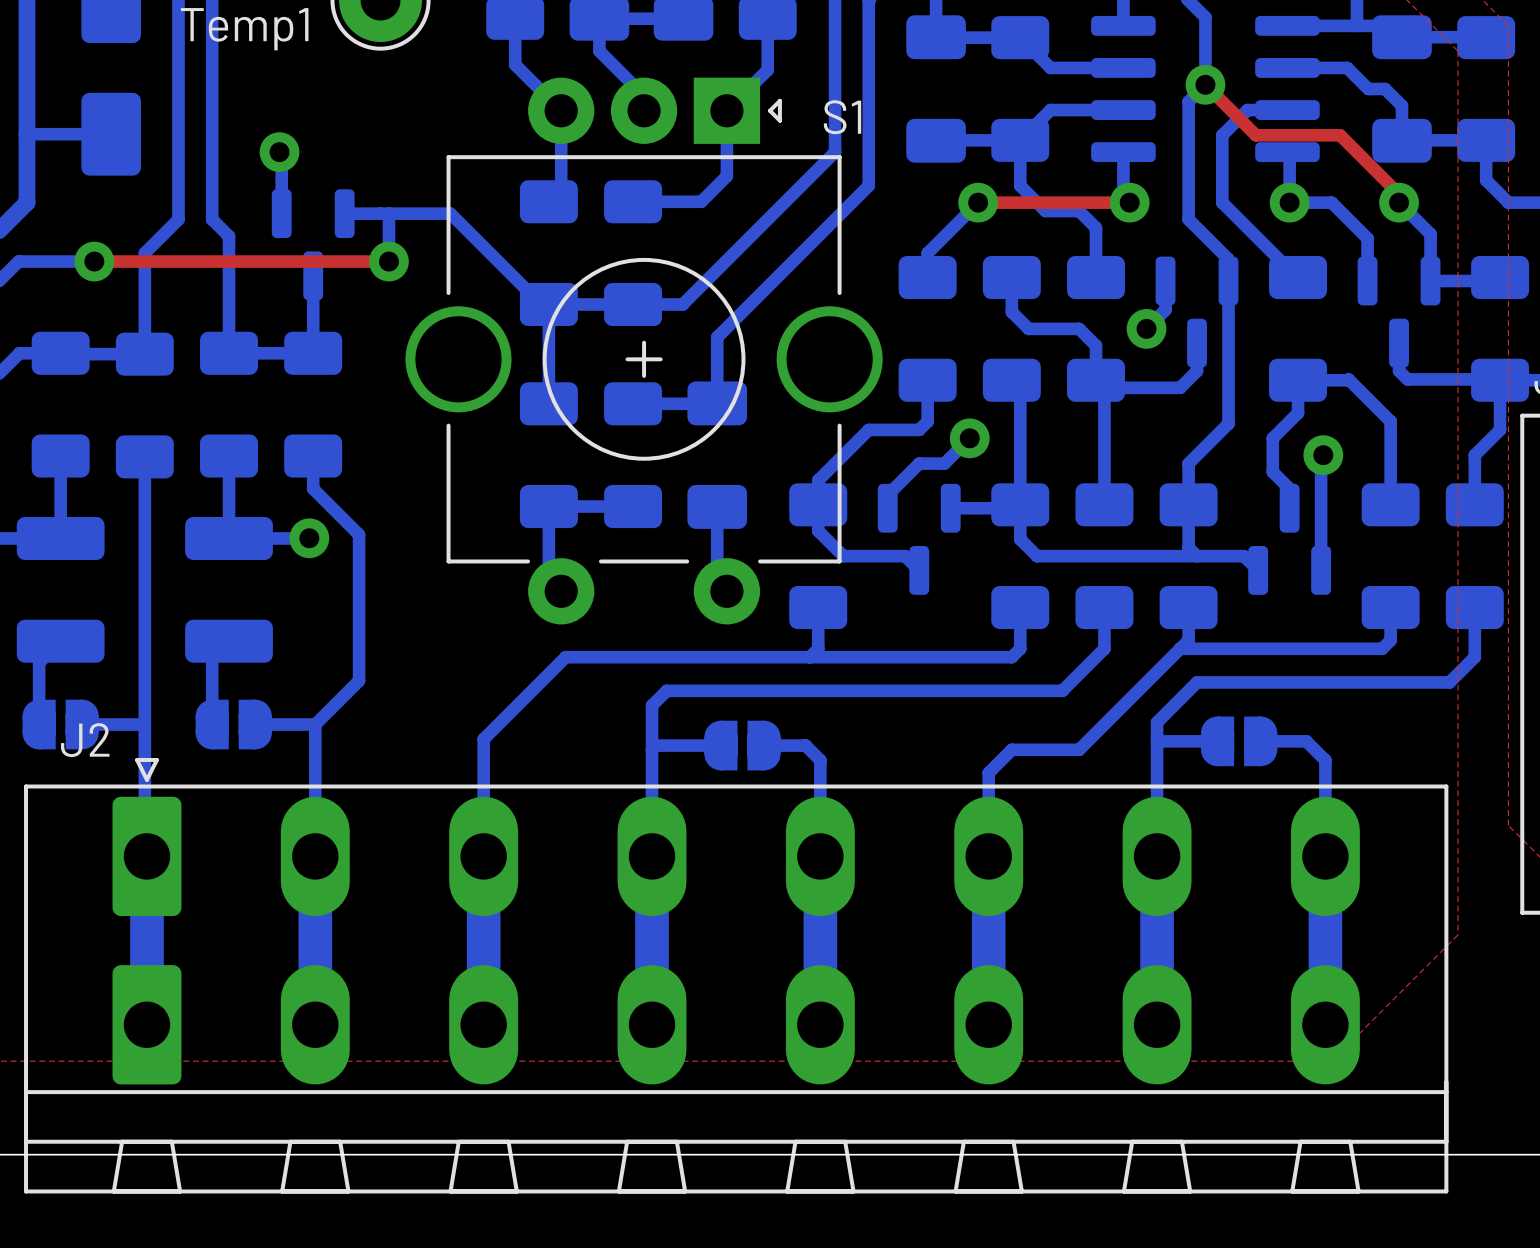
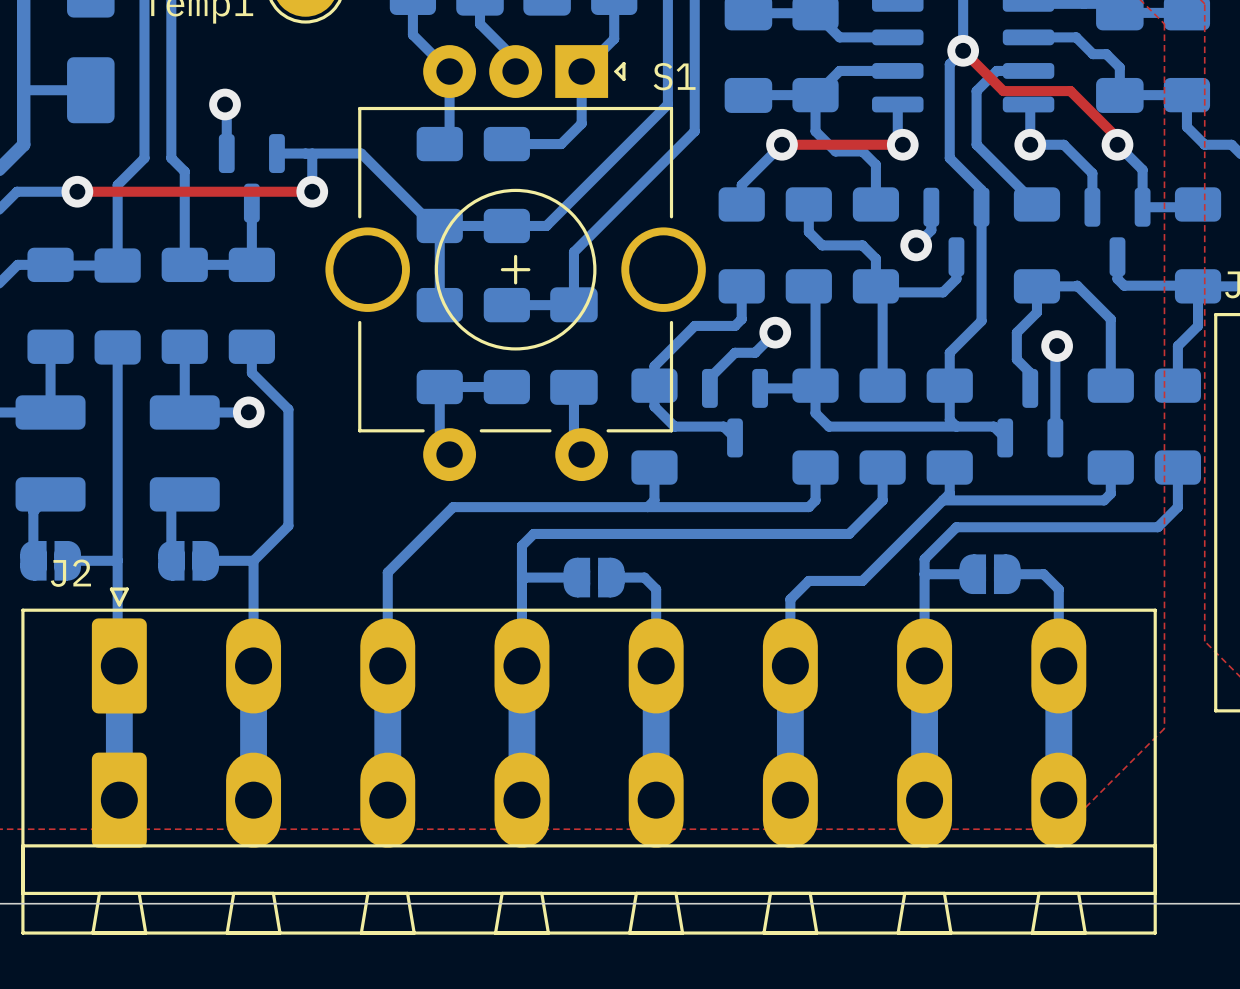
J2 footprint: [24, 757, 1449, 1194] -> [21, 587, 1157, 935]

